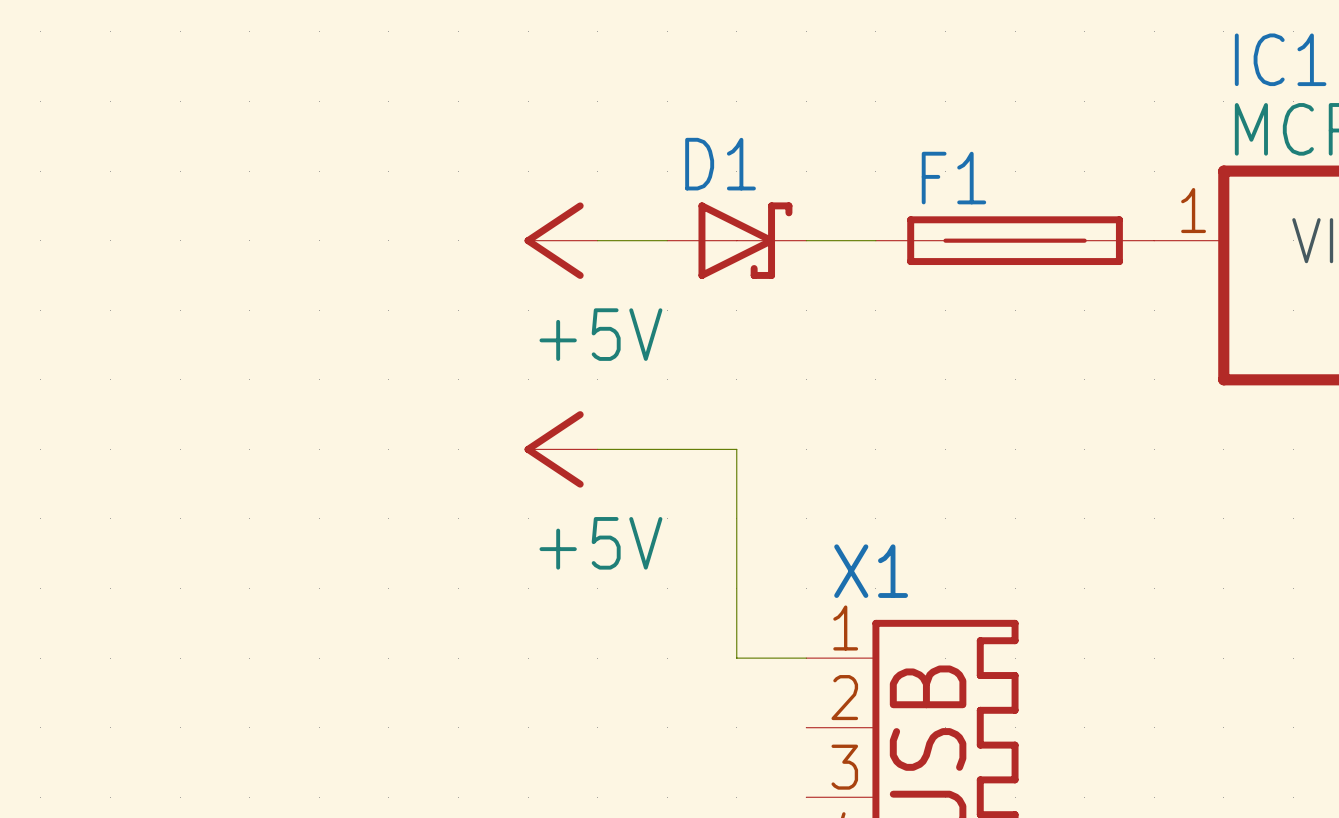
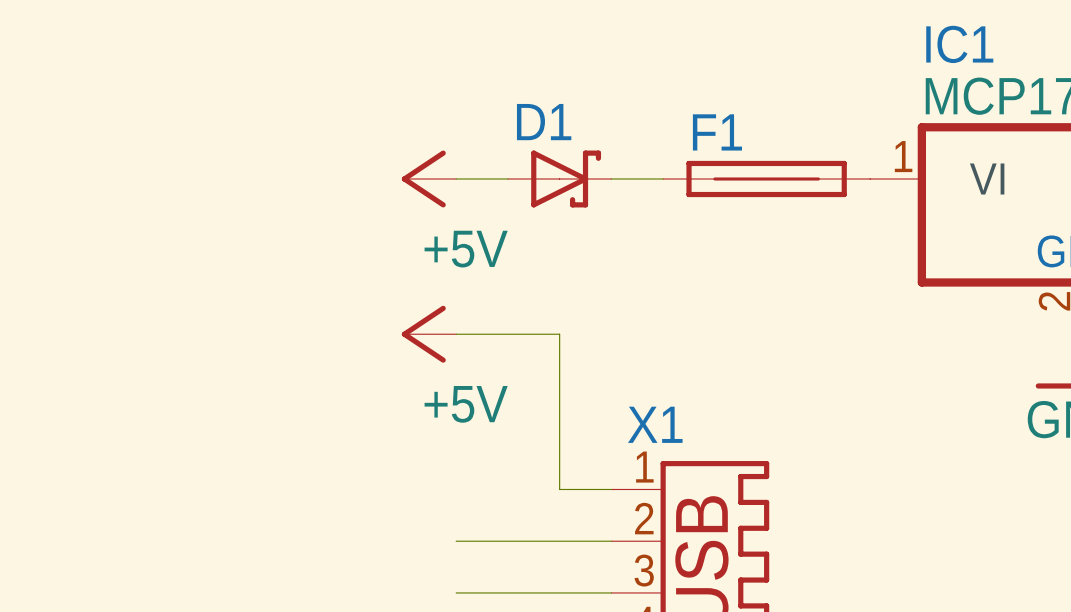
wire: none -> (456, 541) (611, 541)
wire: none -> (456, 592) (611, 592)

